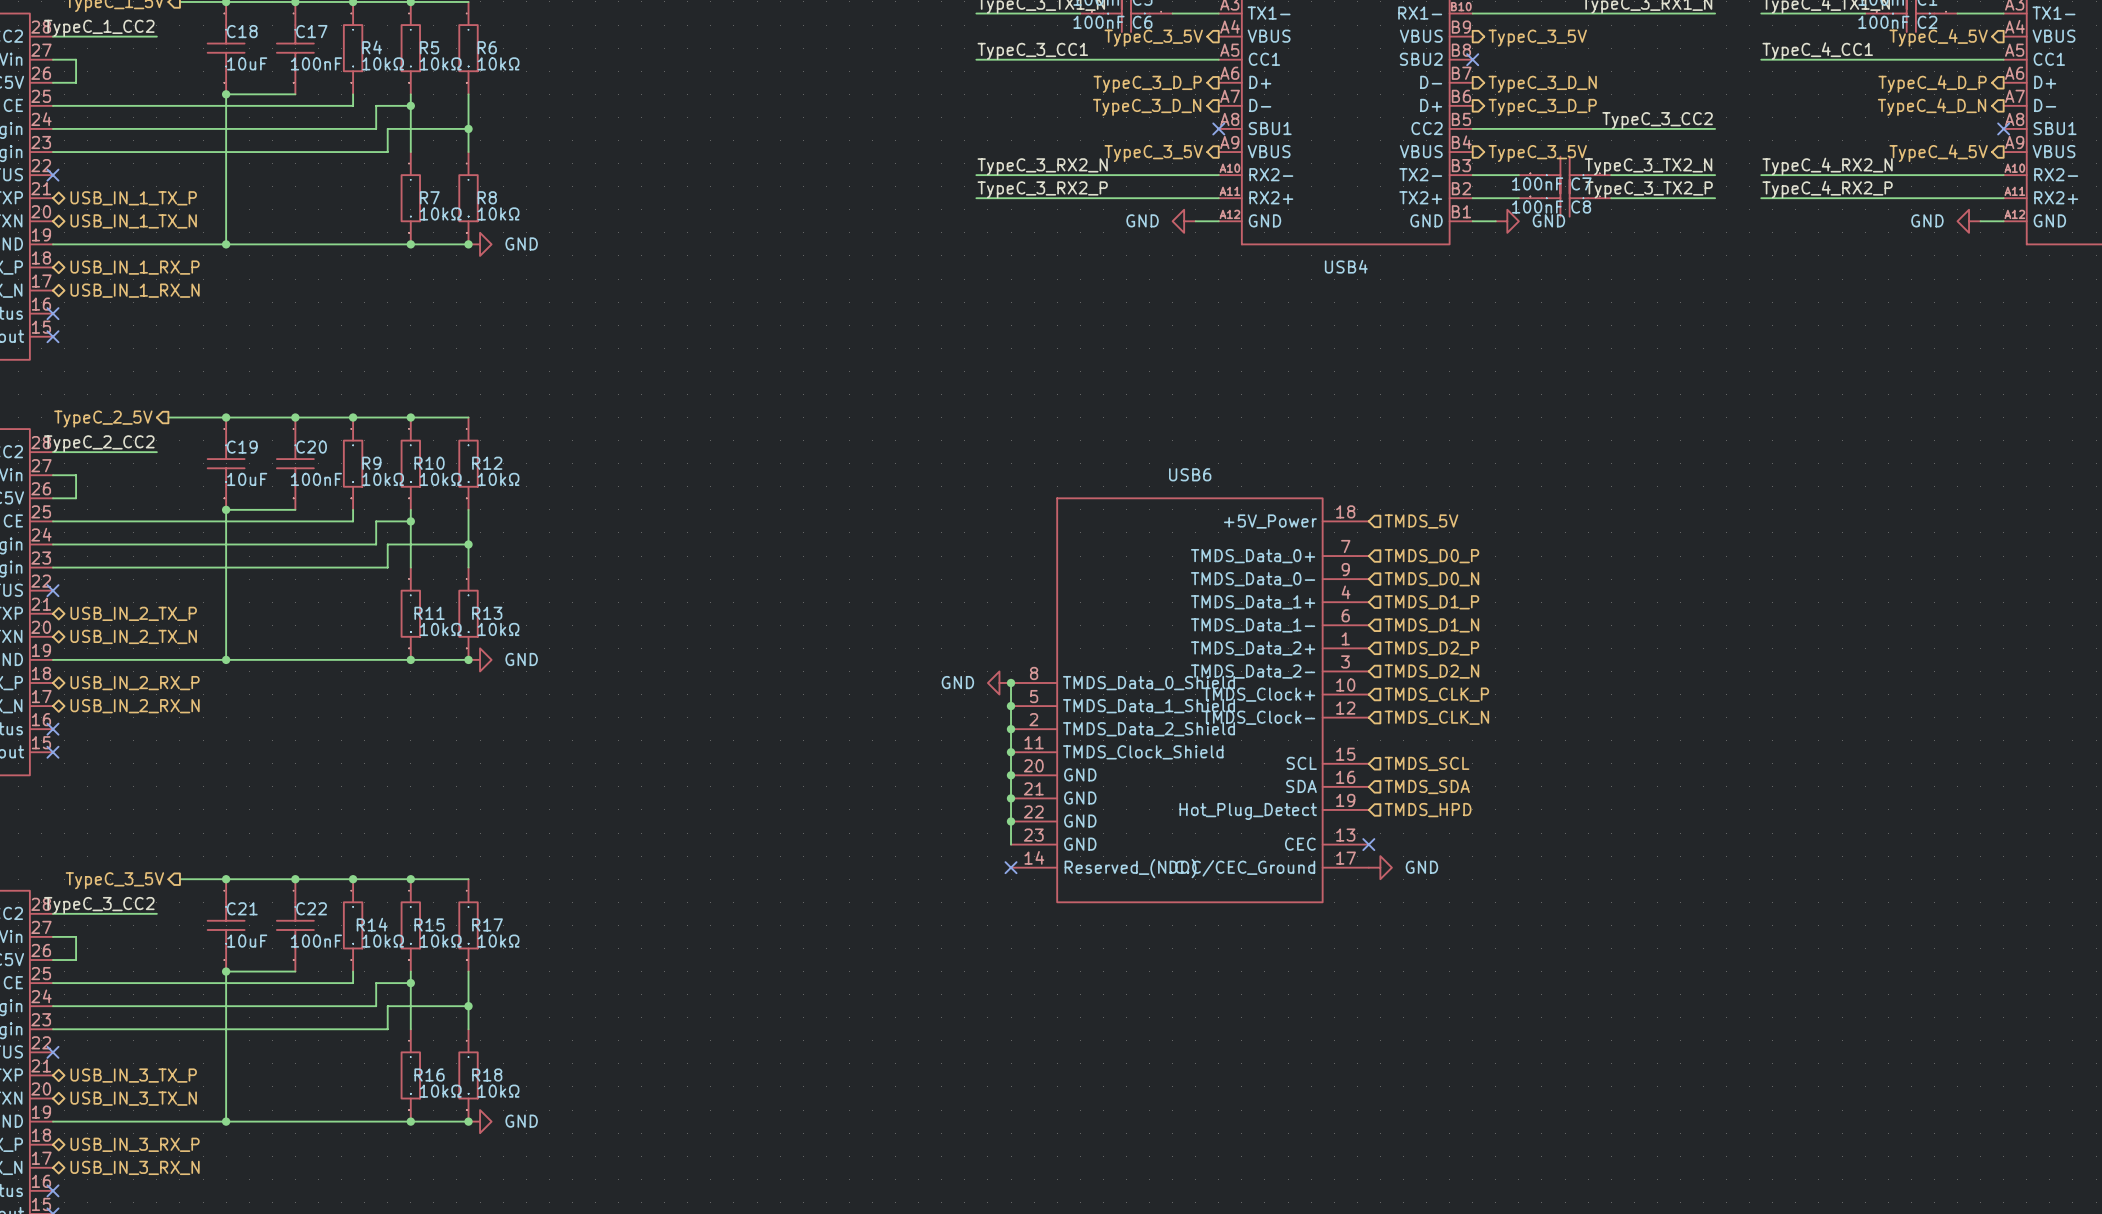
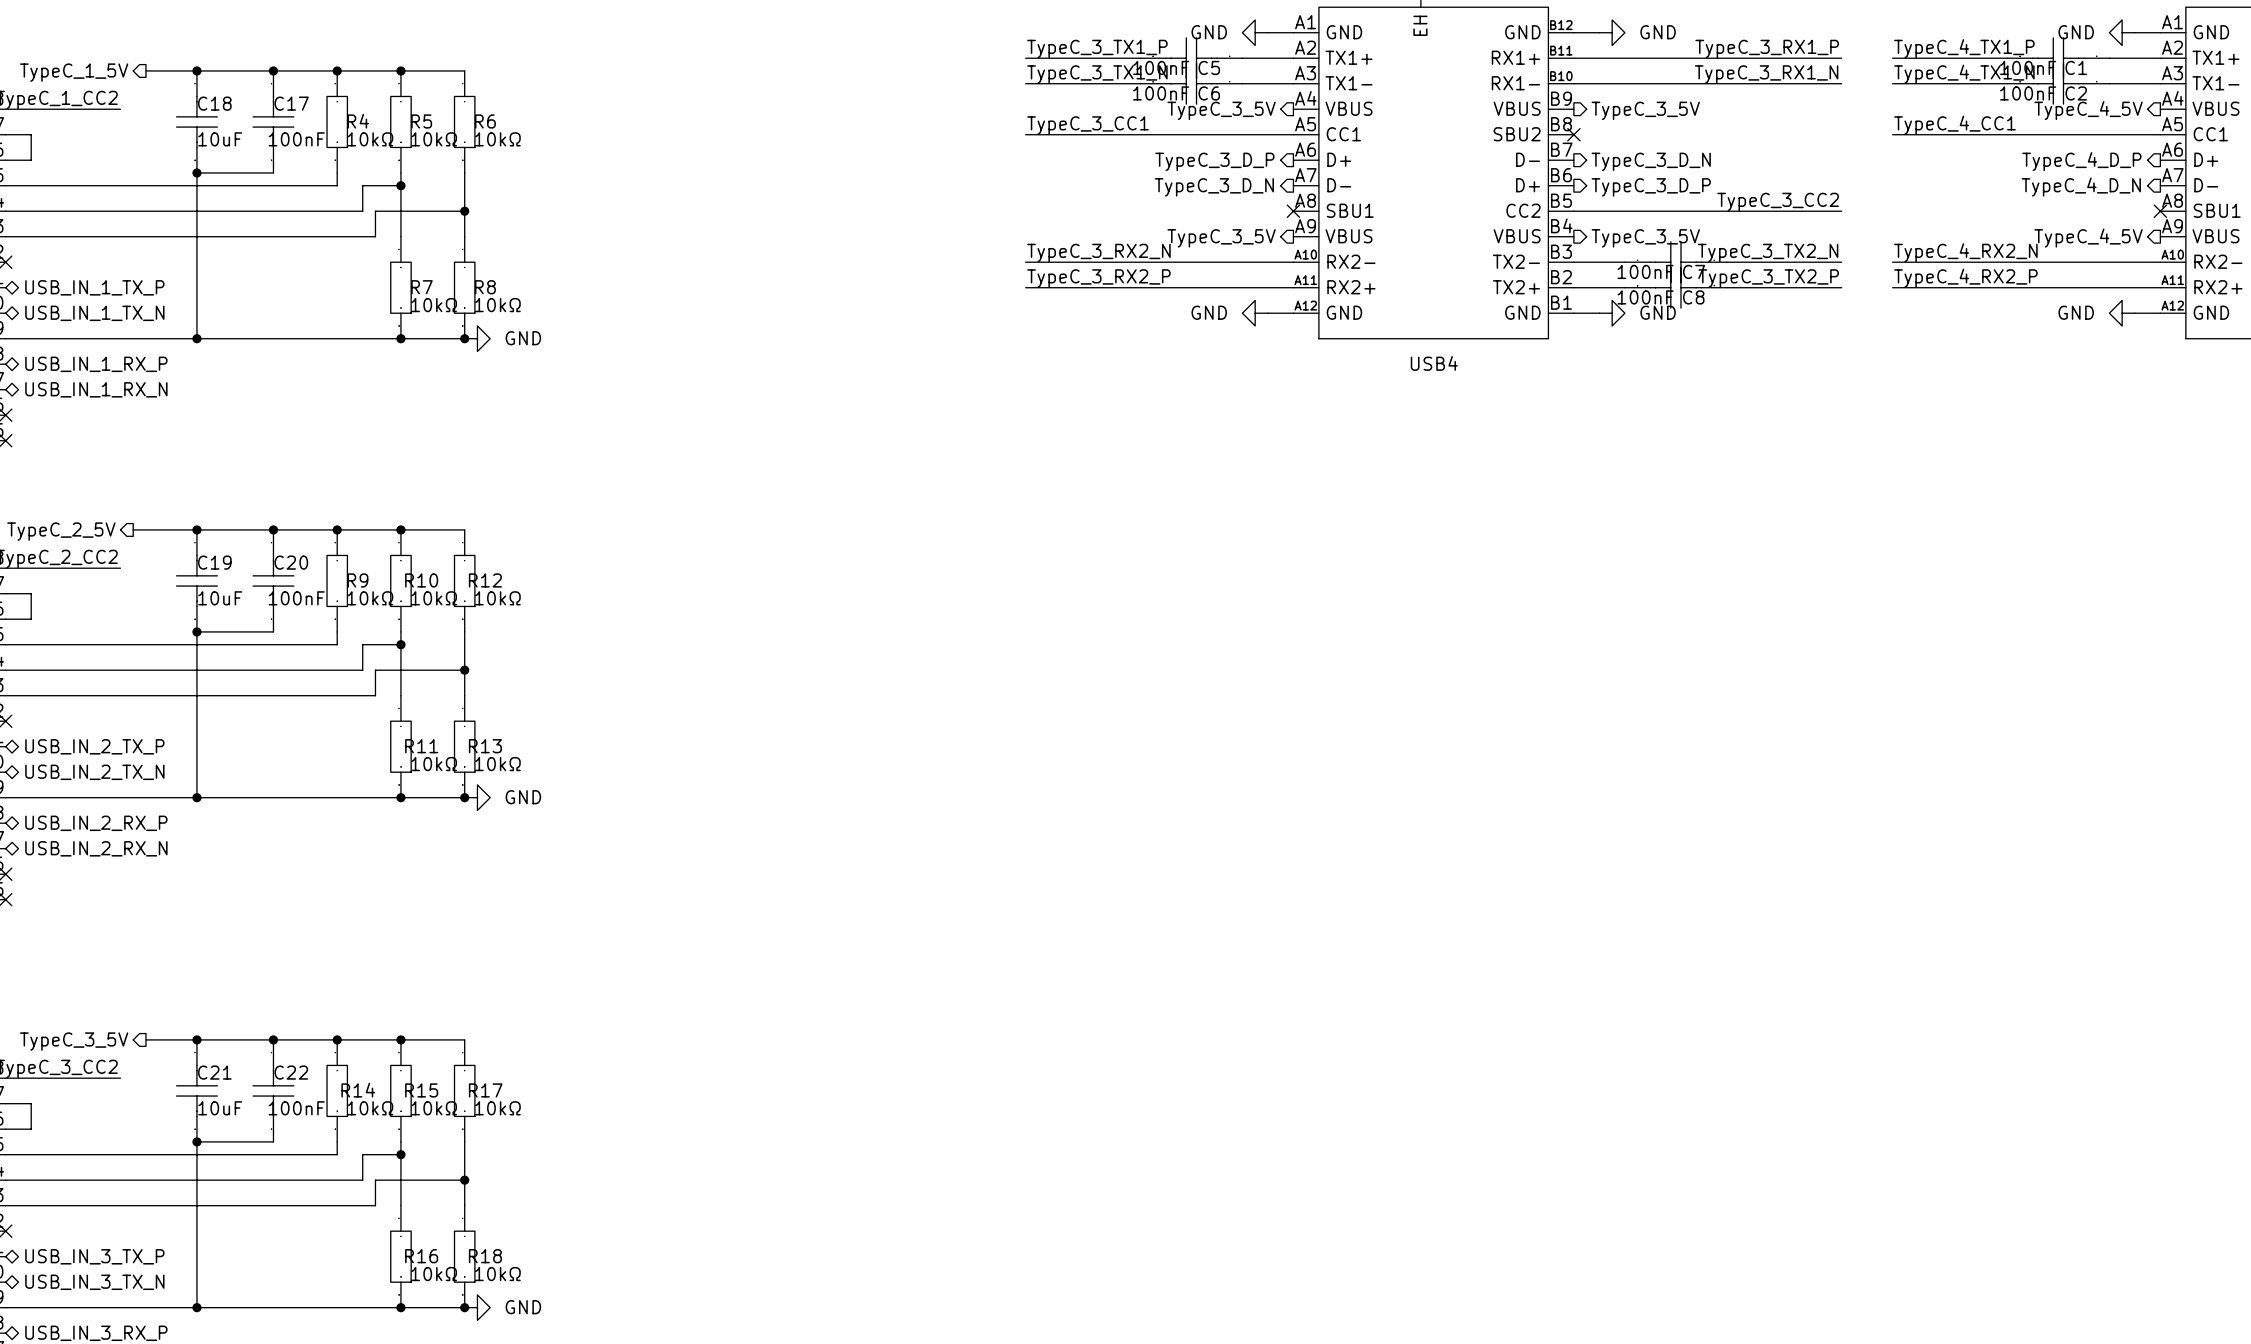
hierarchical label: TMDS_5V (1421, 521) -> none
hierarchical label: TMDS_D0_P (1431, 556) -> none
hierarchical label: TMDS_D0_N (1431, 579) -> none
hierarchical label: TMDS_D1_P (1431, 602) -> none
hierarchical label: TMDS_D1_N (1431, 625) -> none
hierarchical label: TMDS_D2_P (1431, 648) -> none
hierarchical label: TMDS_D2_N (1431, 671) -> none
power symbol: GND (999, 682) -> none
wire: (1011, 682) (1011, 844) -> none
junction: (1011, 682) -> none
hierarchical label: TMDS_CLK_P (1436, 694) -> none
USB6: (1189, 700) -> none
junction: (1011, 706) -> none
hierarchical label: TMDS_CLK_N (1436, 717) -> none
junction: (1011, 729) -> none
junction: (1011, 752) -> none
hierarchical label: TMDS_SCL (1426, 763) -> none
junction: (1011, 775) -> none
hierarchical label: TMDS_SDA (1427, 786) -> none
junction: (1011, 798) -> none
hierarchical label: TMDS_HPD (1428, 810) -> none
junction: (1011, 821) -> none
no-connect mark: (1368, 844) -> none
no-connect mark: (1011, 867) -> none
power symbol: GND (1380, 867) -> none

